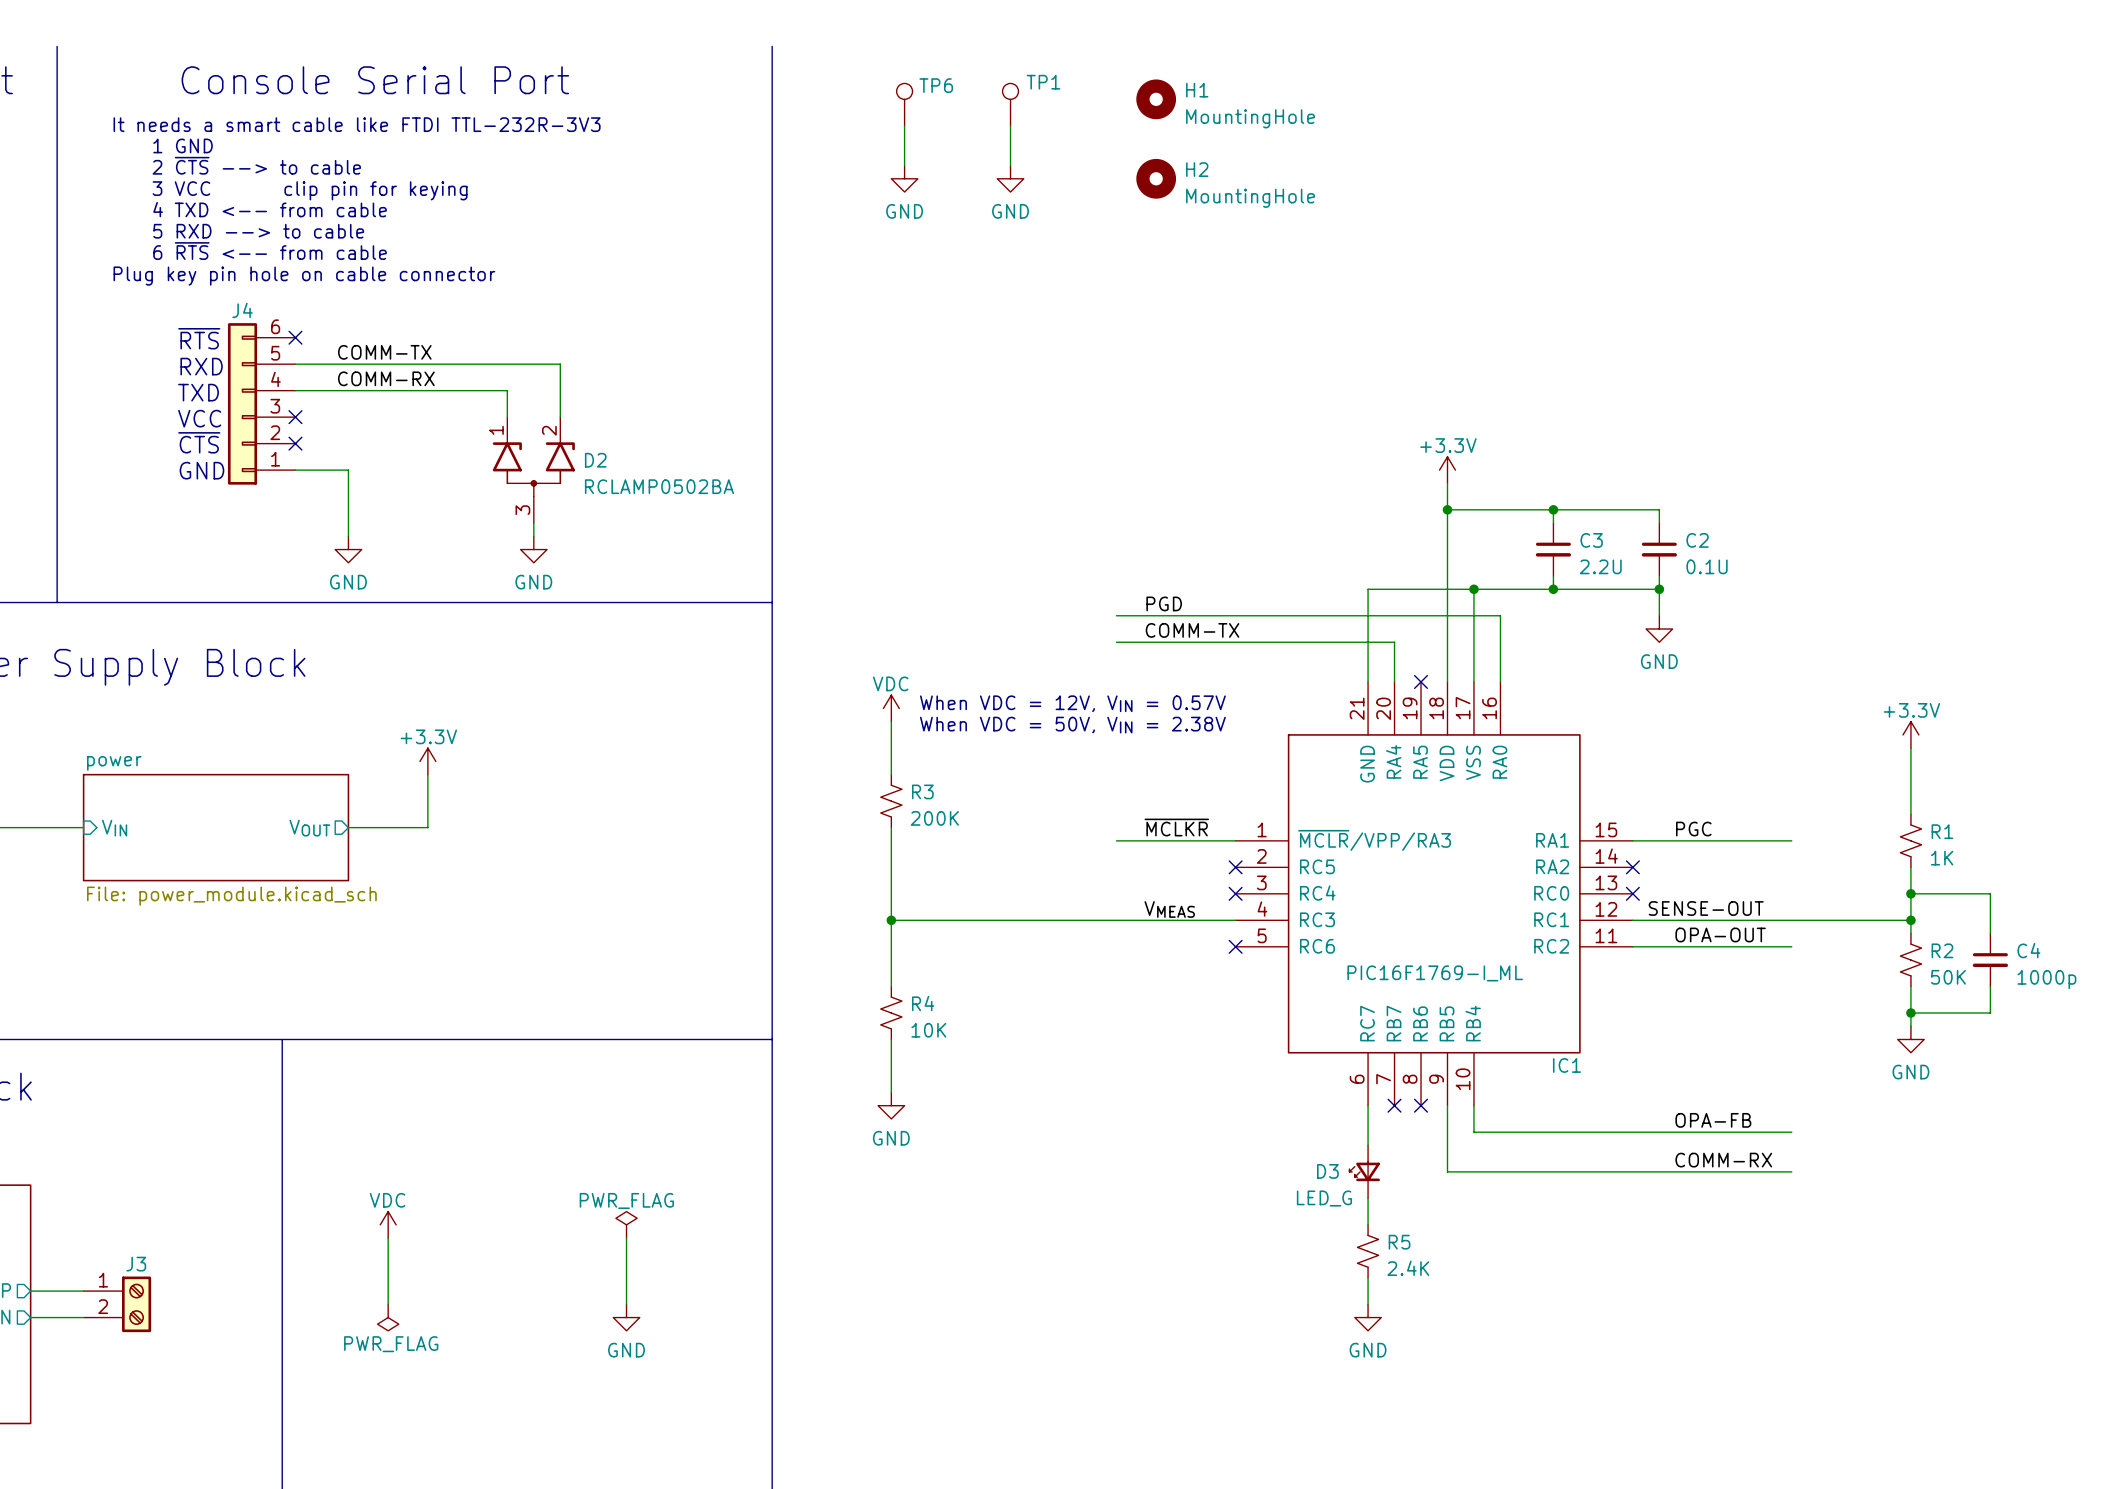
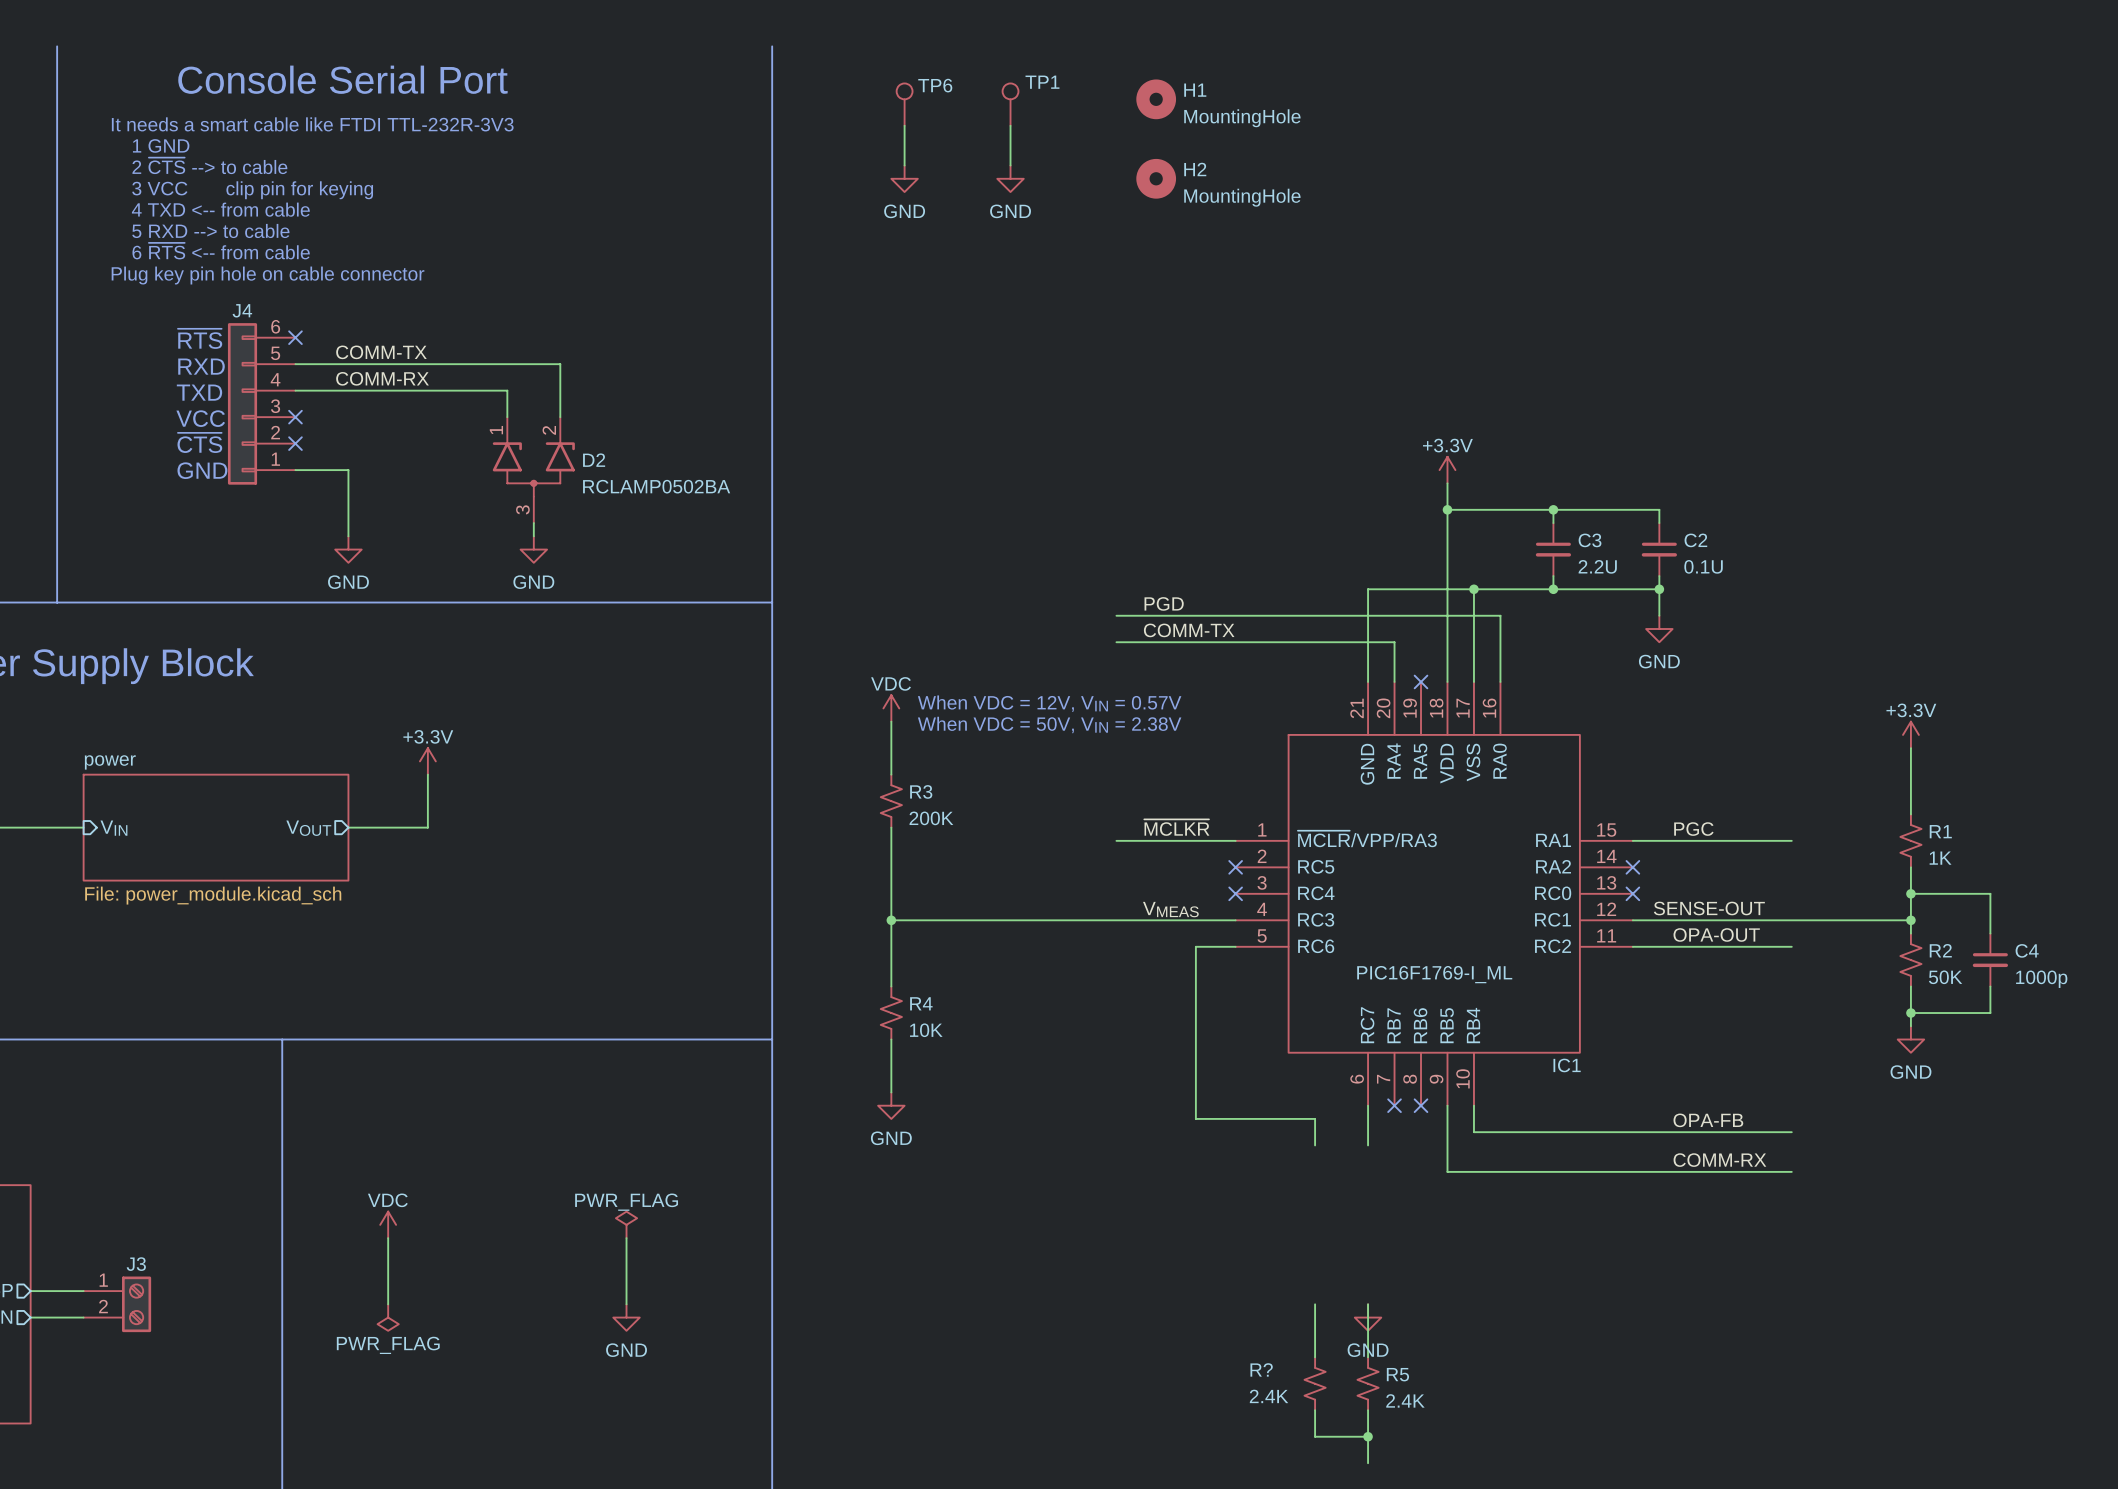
wire: none -> (1235, 946) (1195, 946) (1195, 1118) (1315, 1118) (1315, 1145)
no-connect mark: (1235, 946) -> none
D3: LED_G (1364, 1171) -> none
wire: (1368, 1198) (1368, 1224) -> none
R5 position: (1368, 1251) -> (1368, 1383)
wire: (1368, 1277) (1368, 1304) -> (1368, 1357) (1368, 1304)
wire: none -> (1315, 1304) (1315, 1357)
R?: none -> 2.4K (1315, 1383)
wire: none -> (1315, 1410) (1315, 1436) (1368, 1436)
wire: none -> (1368, 1410) (1368, 1463)
junction: none -> (1368, 1436)

